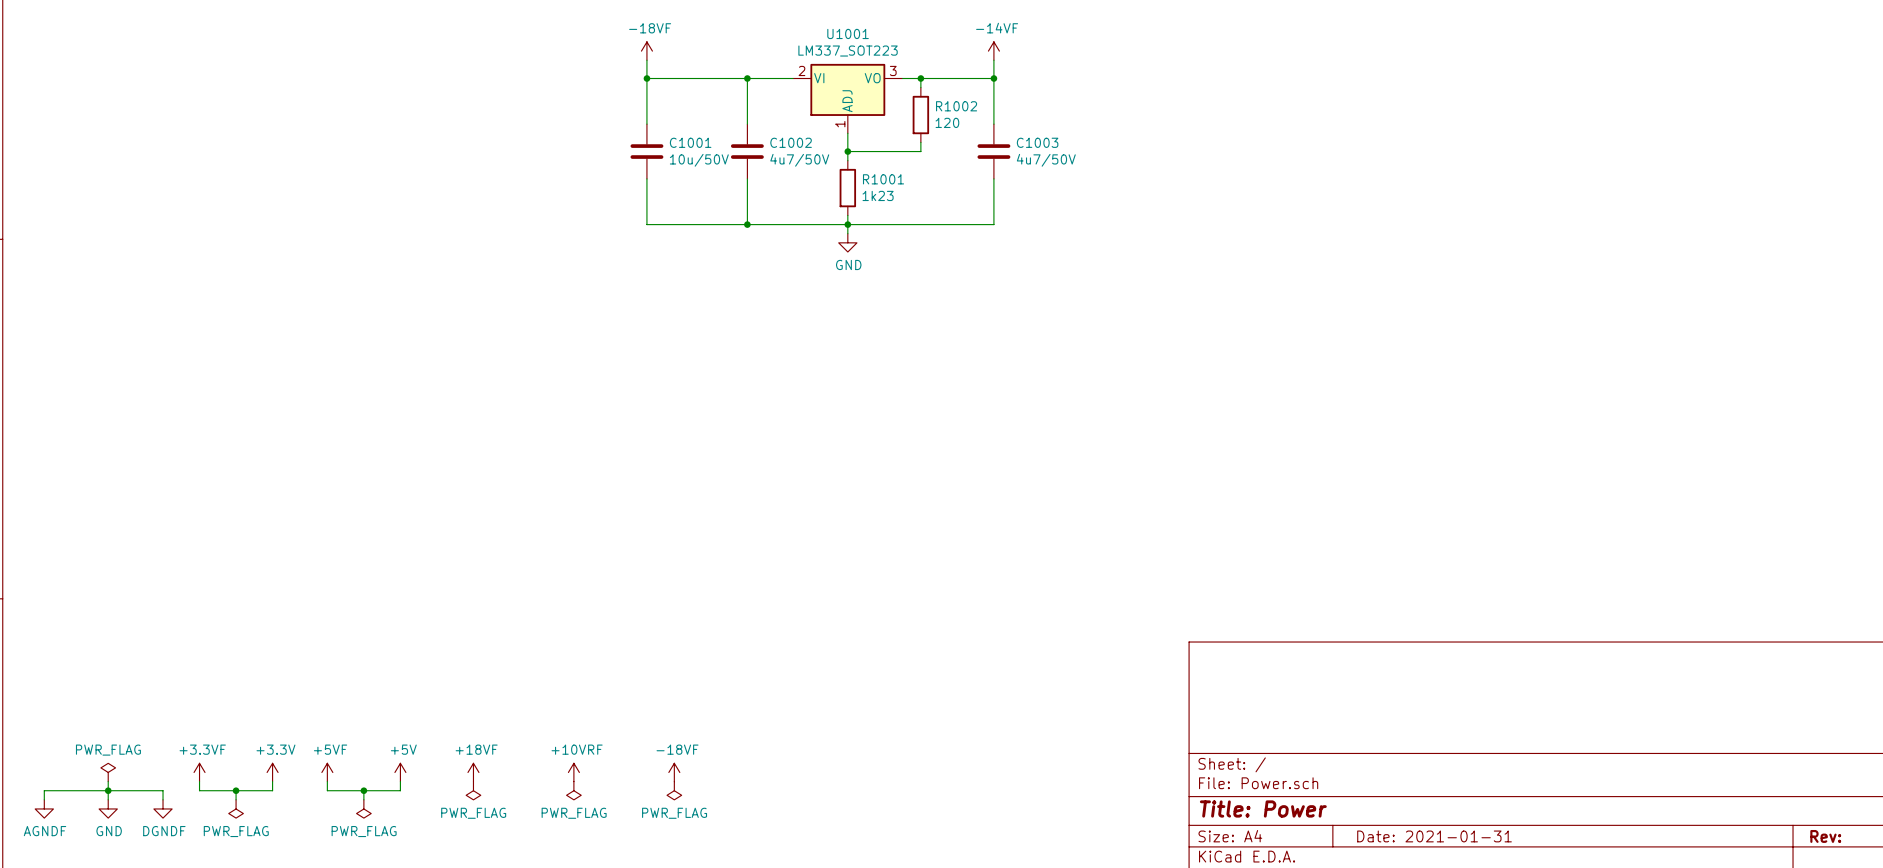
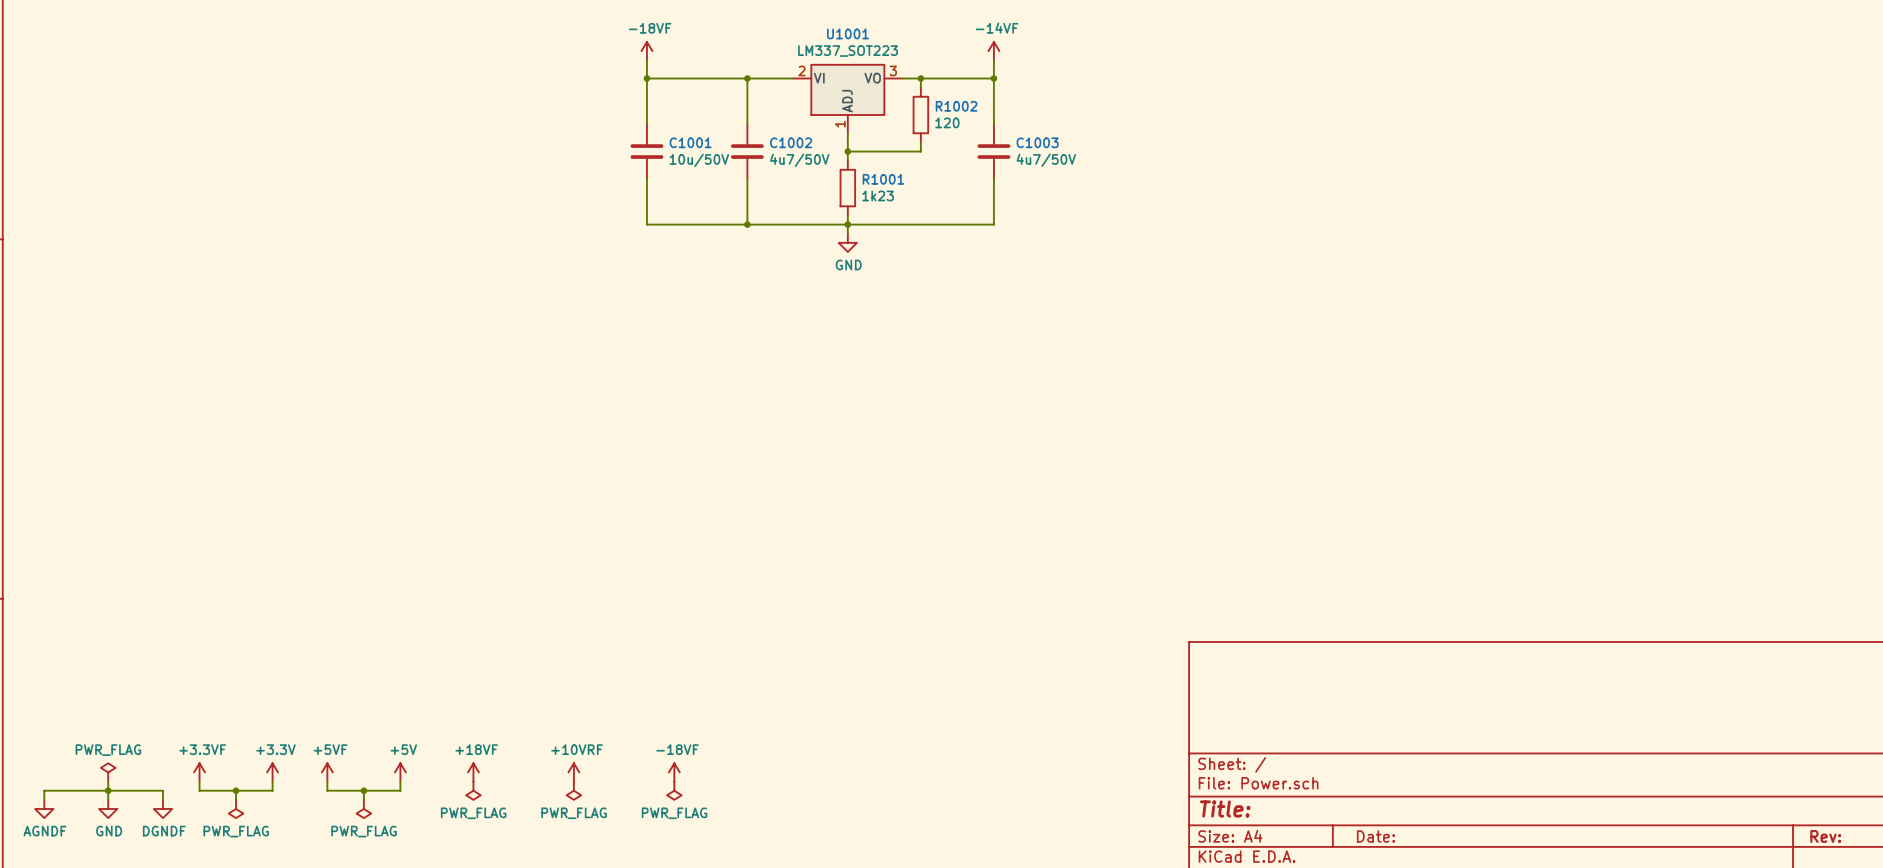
title block: Title: Power (1263, 808) -> Title: (1225, 808)
title block: Date: 2021-01-31 (1434, 836) -> Date: (1375, 836)

